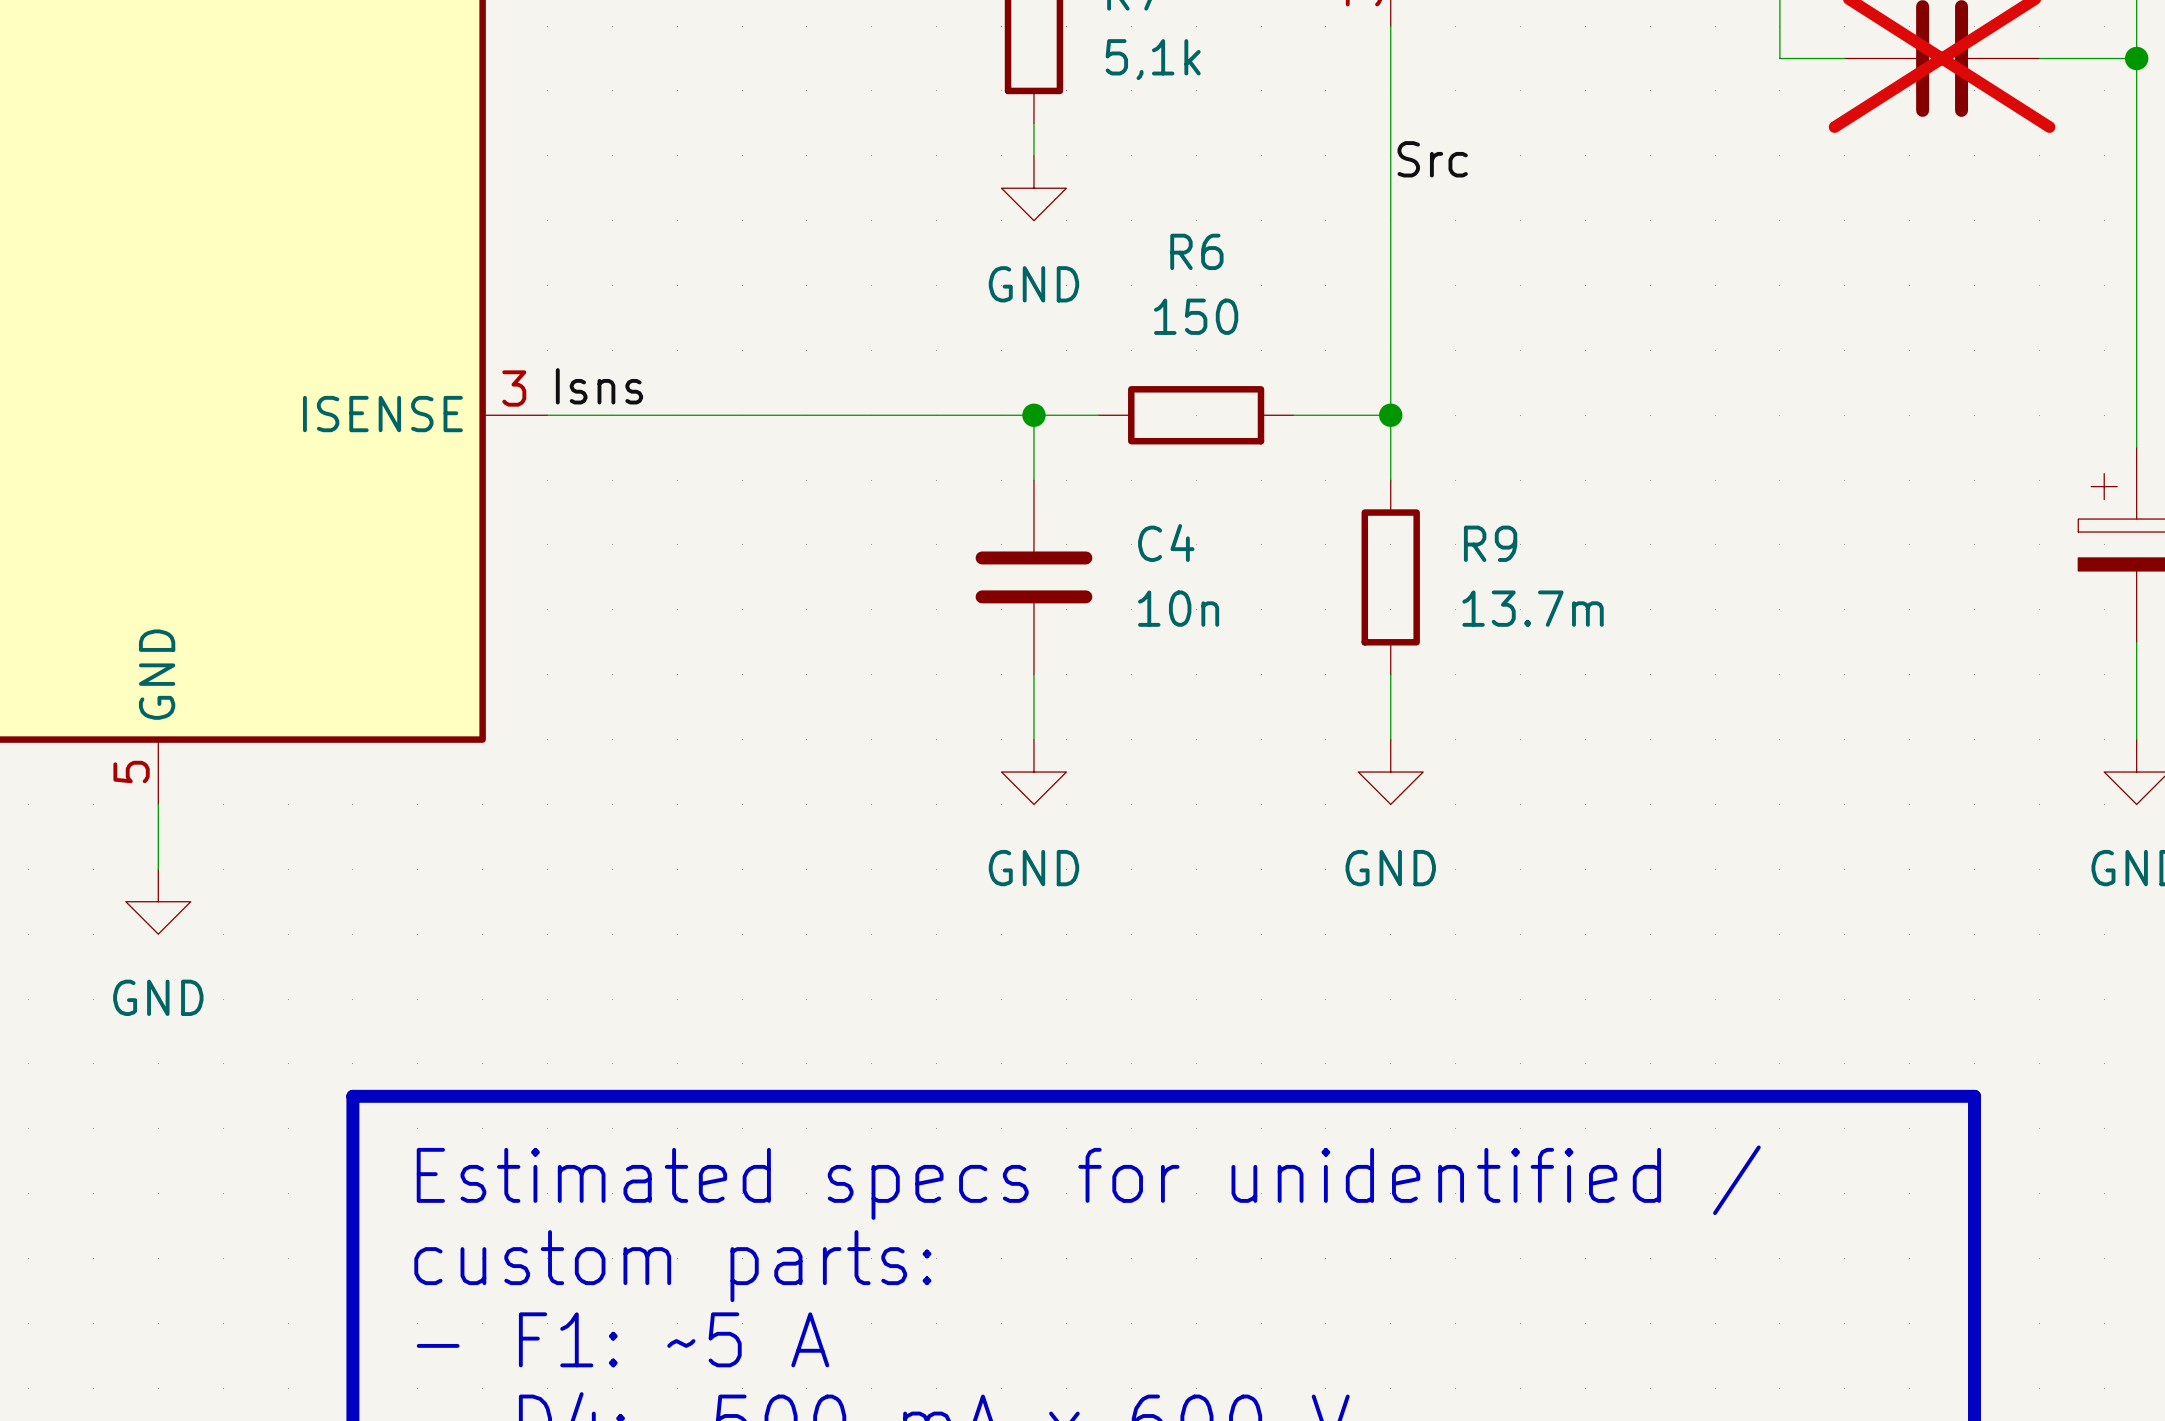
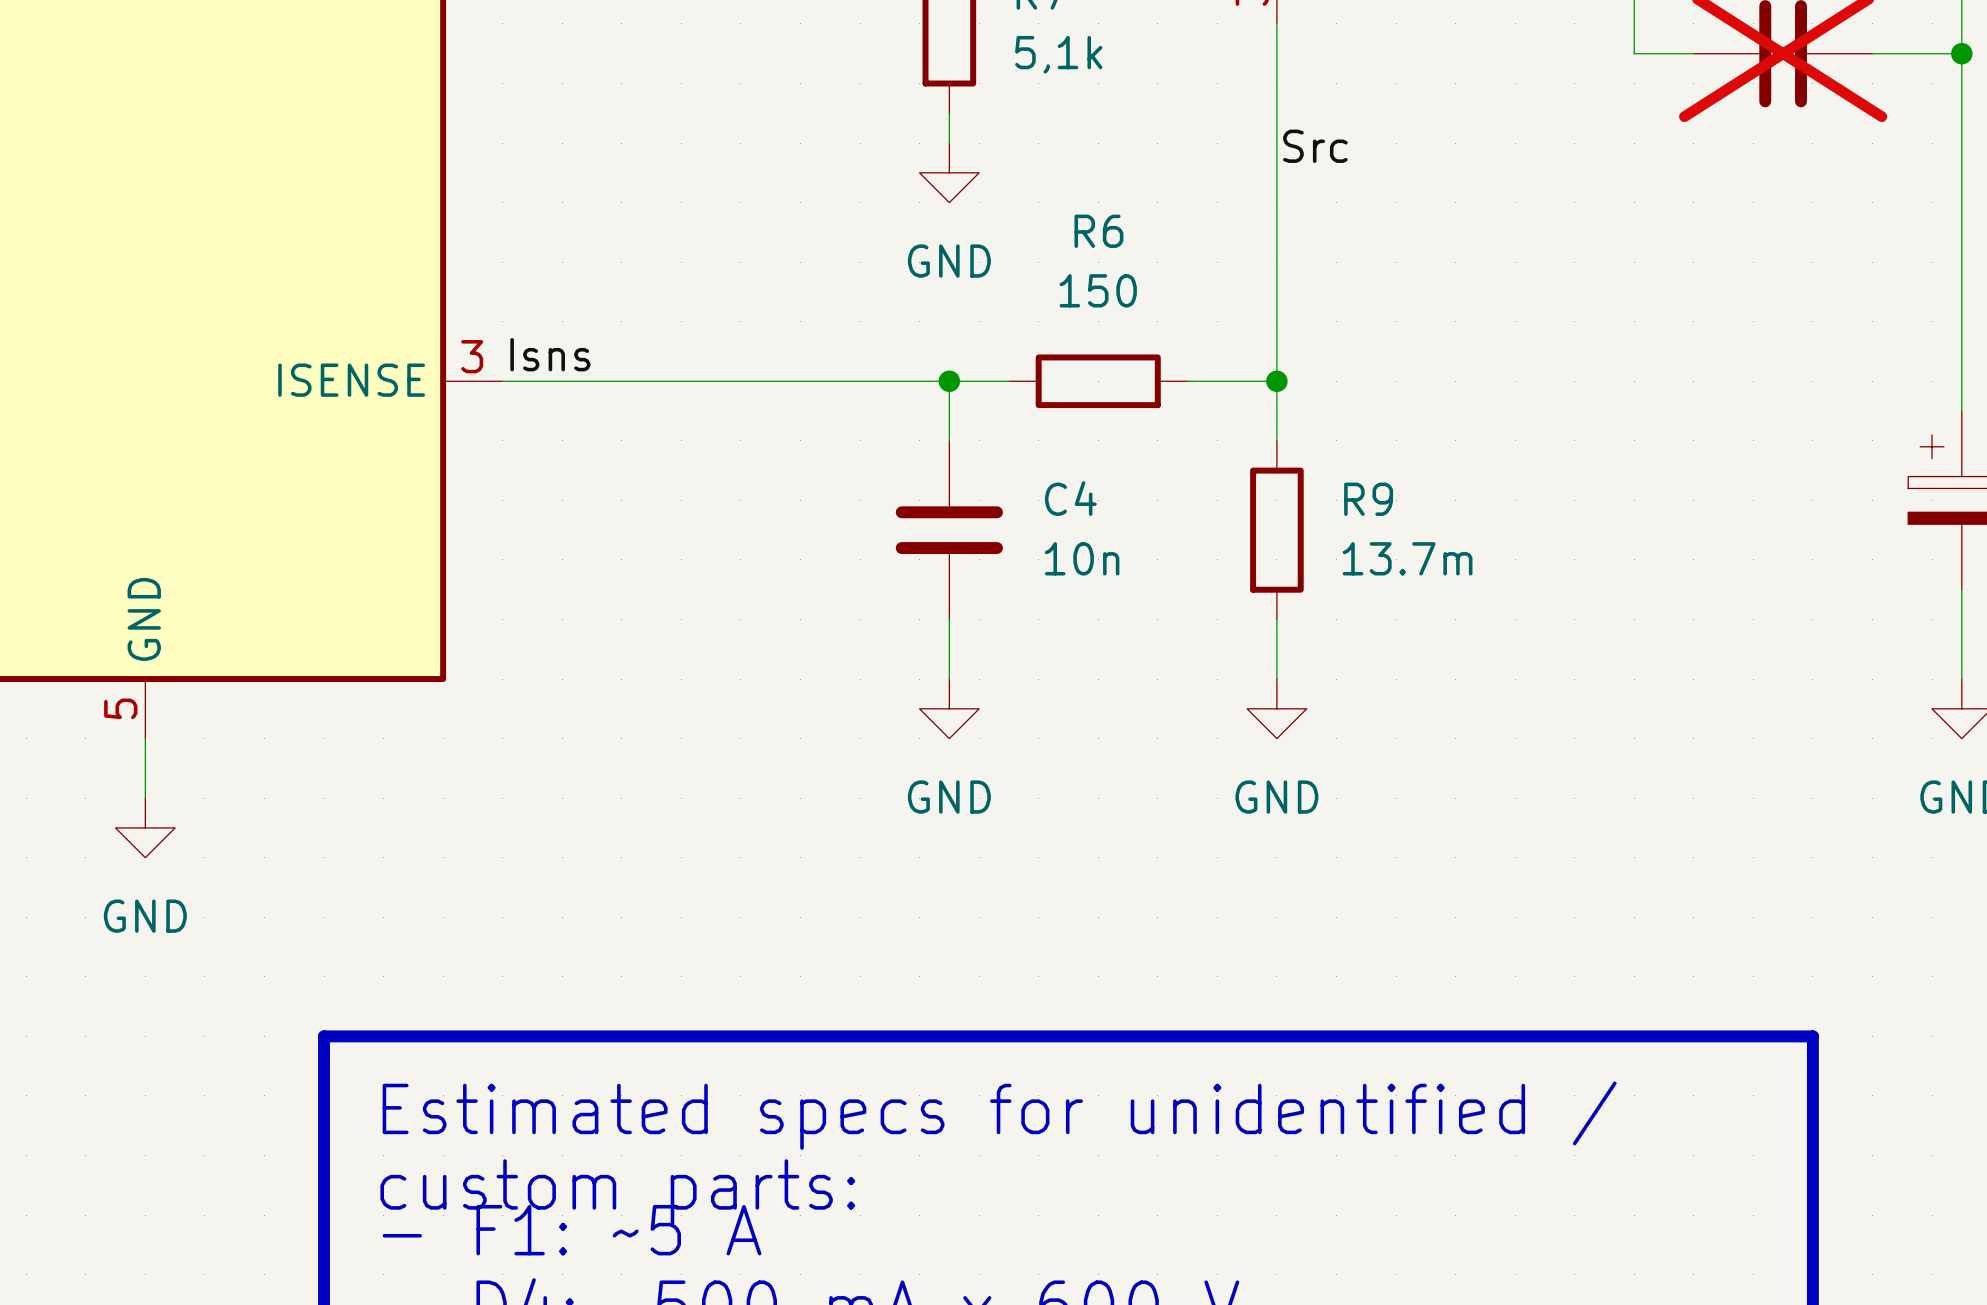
line: (352, 1128) (352, 1096) (1974, 1096) (1974, 1128) -> (324, 1036) (1812, 1036)
text position: Estimated specs for unidentified / (1088, 1182) -> Estimated specs for unidentified / (999, 1115)
text position: custom parts: (672, 1266) -> custom parts: (617, 1192)

